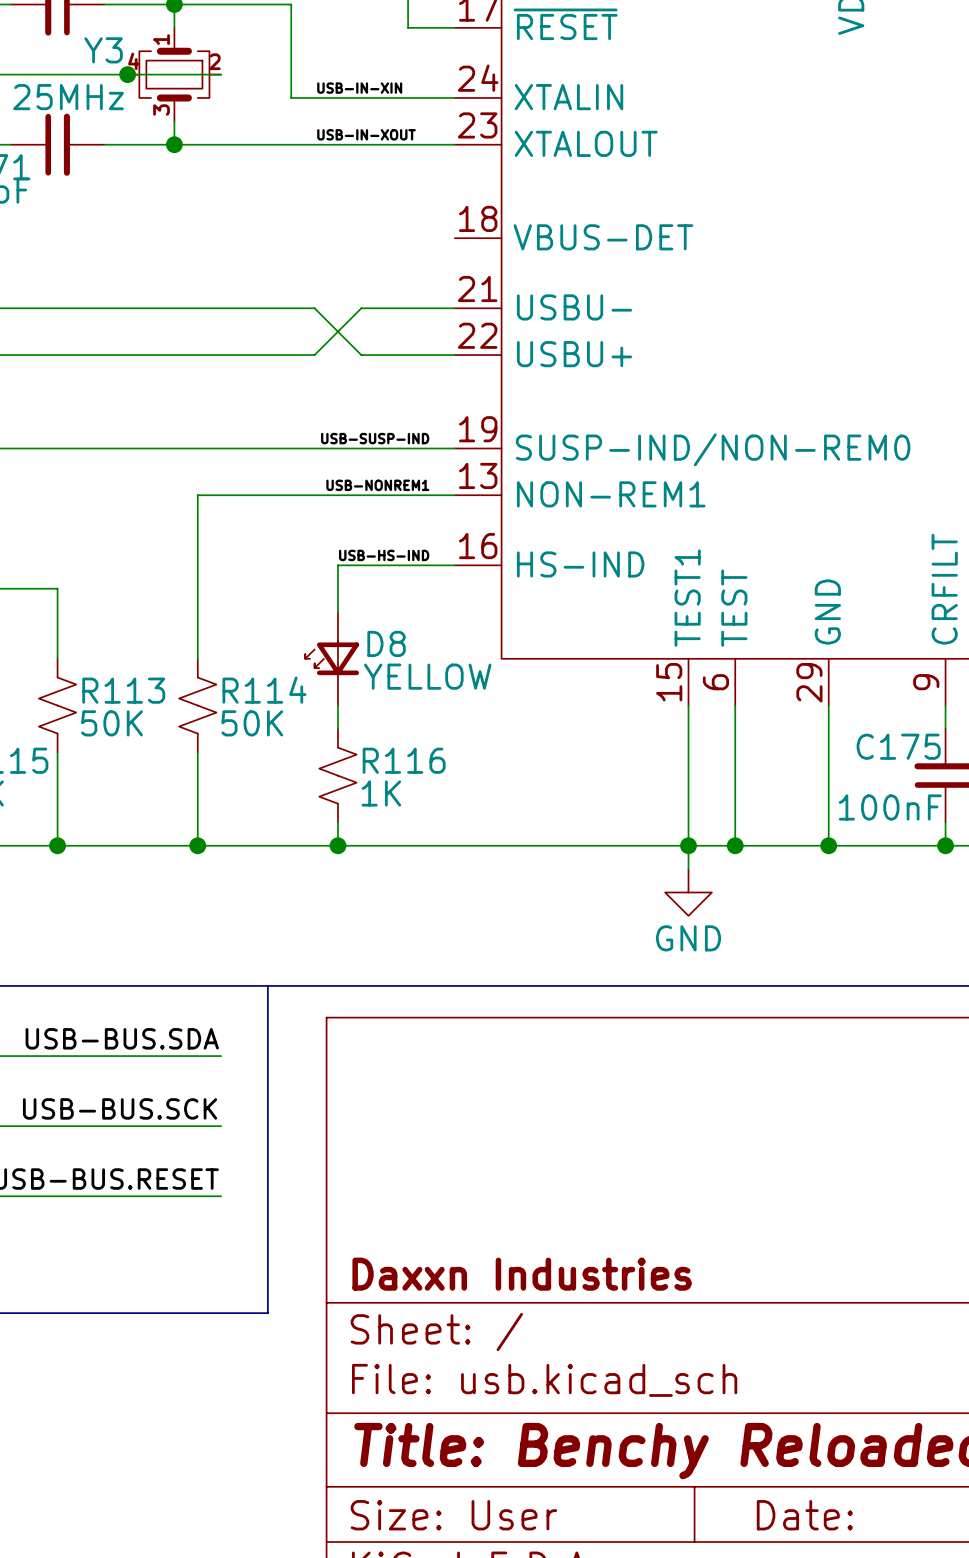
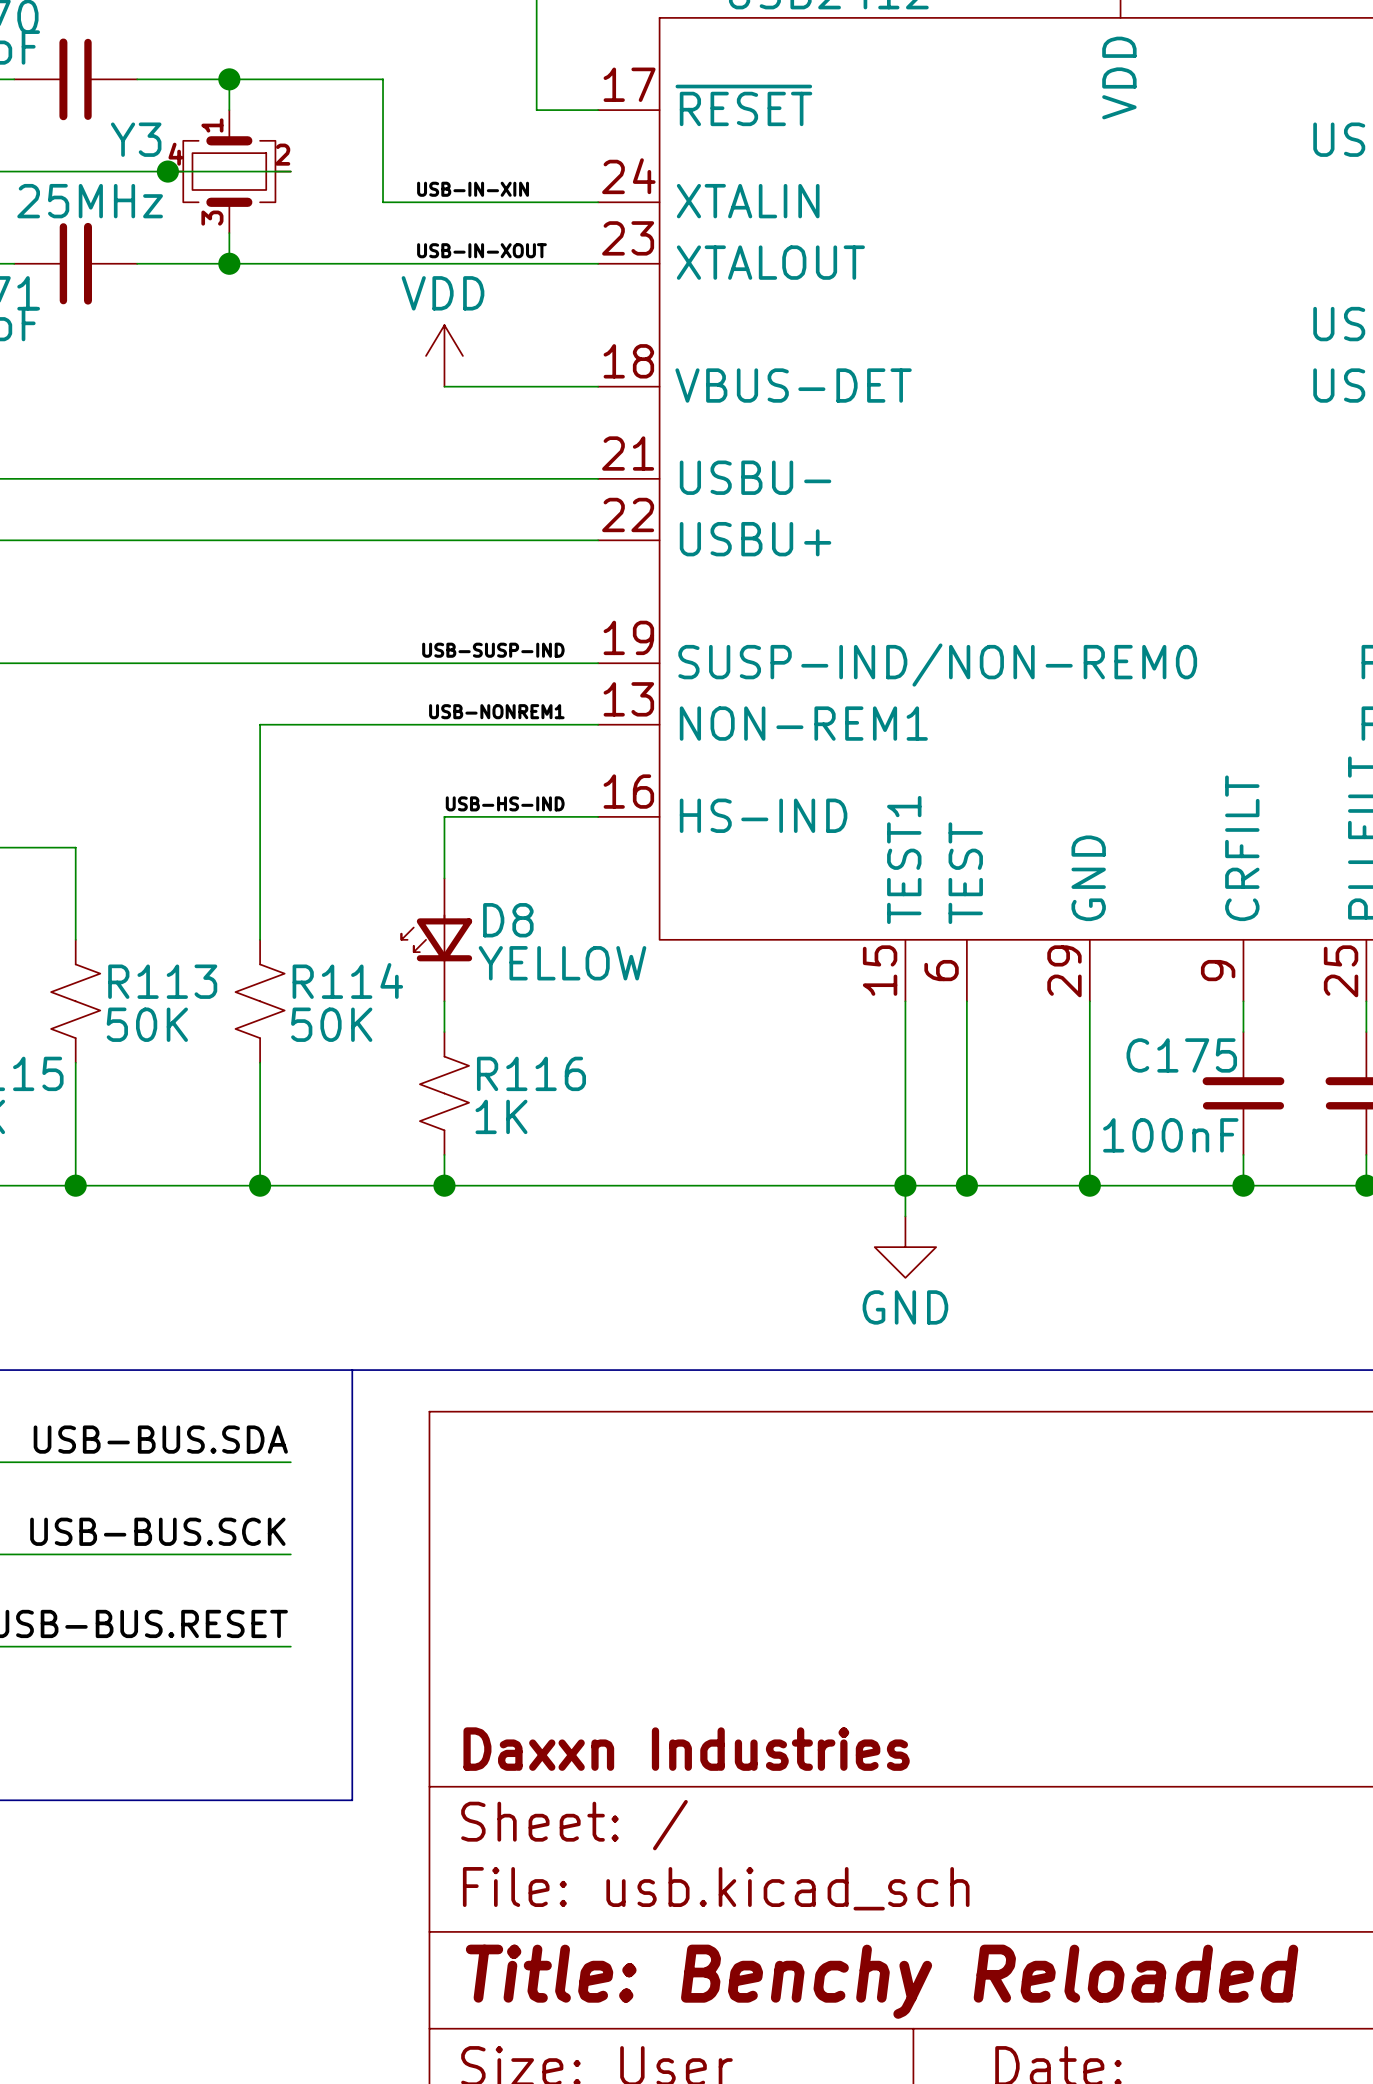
power symbol: none -> VDD (444, 355)
wire: none -> (444, 386) (598, 386)
wire: (314, 308) (361, 355) -> (413, 478) (475, 478)
wire: (361, 308) (314, 355) -> (475, 540) (413, 540)

